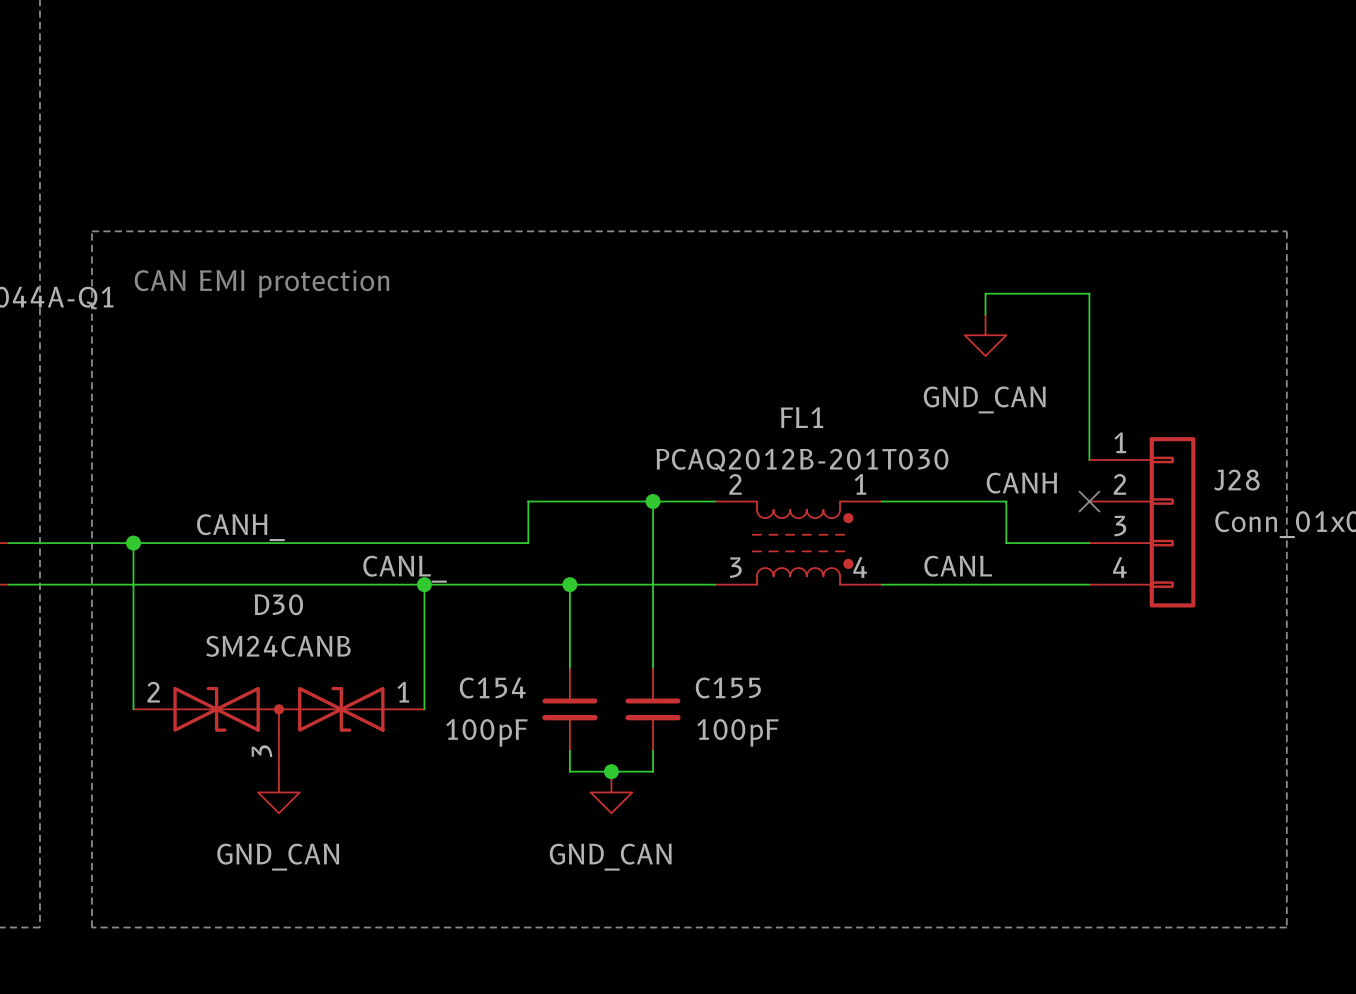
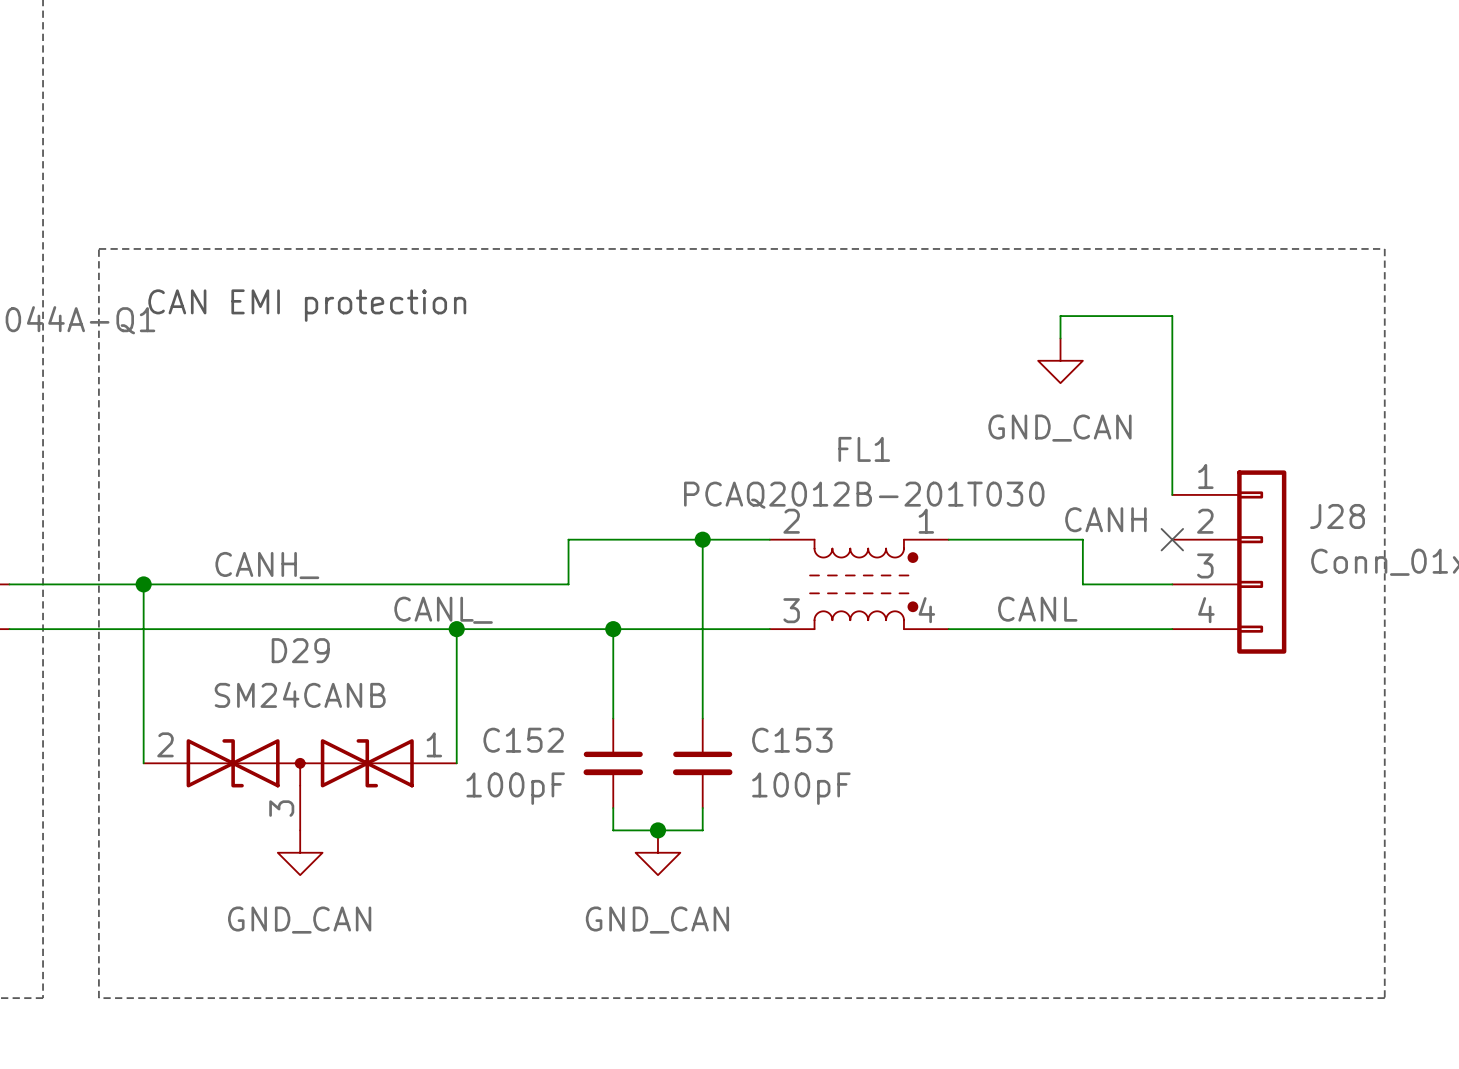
D30 name: D30 (278, 604) -> D29 (300, 650)
C154 name: C154 (492, 687) -> C152 (523, 740)
C155 name: C155 (728, 687) -> C153 (792, 740)

